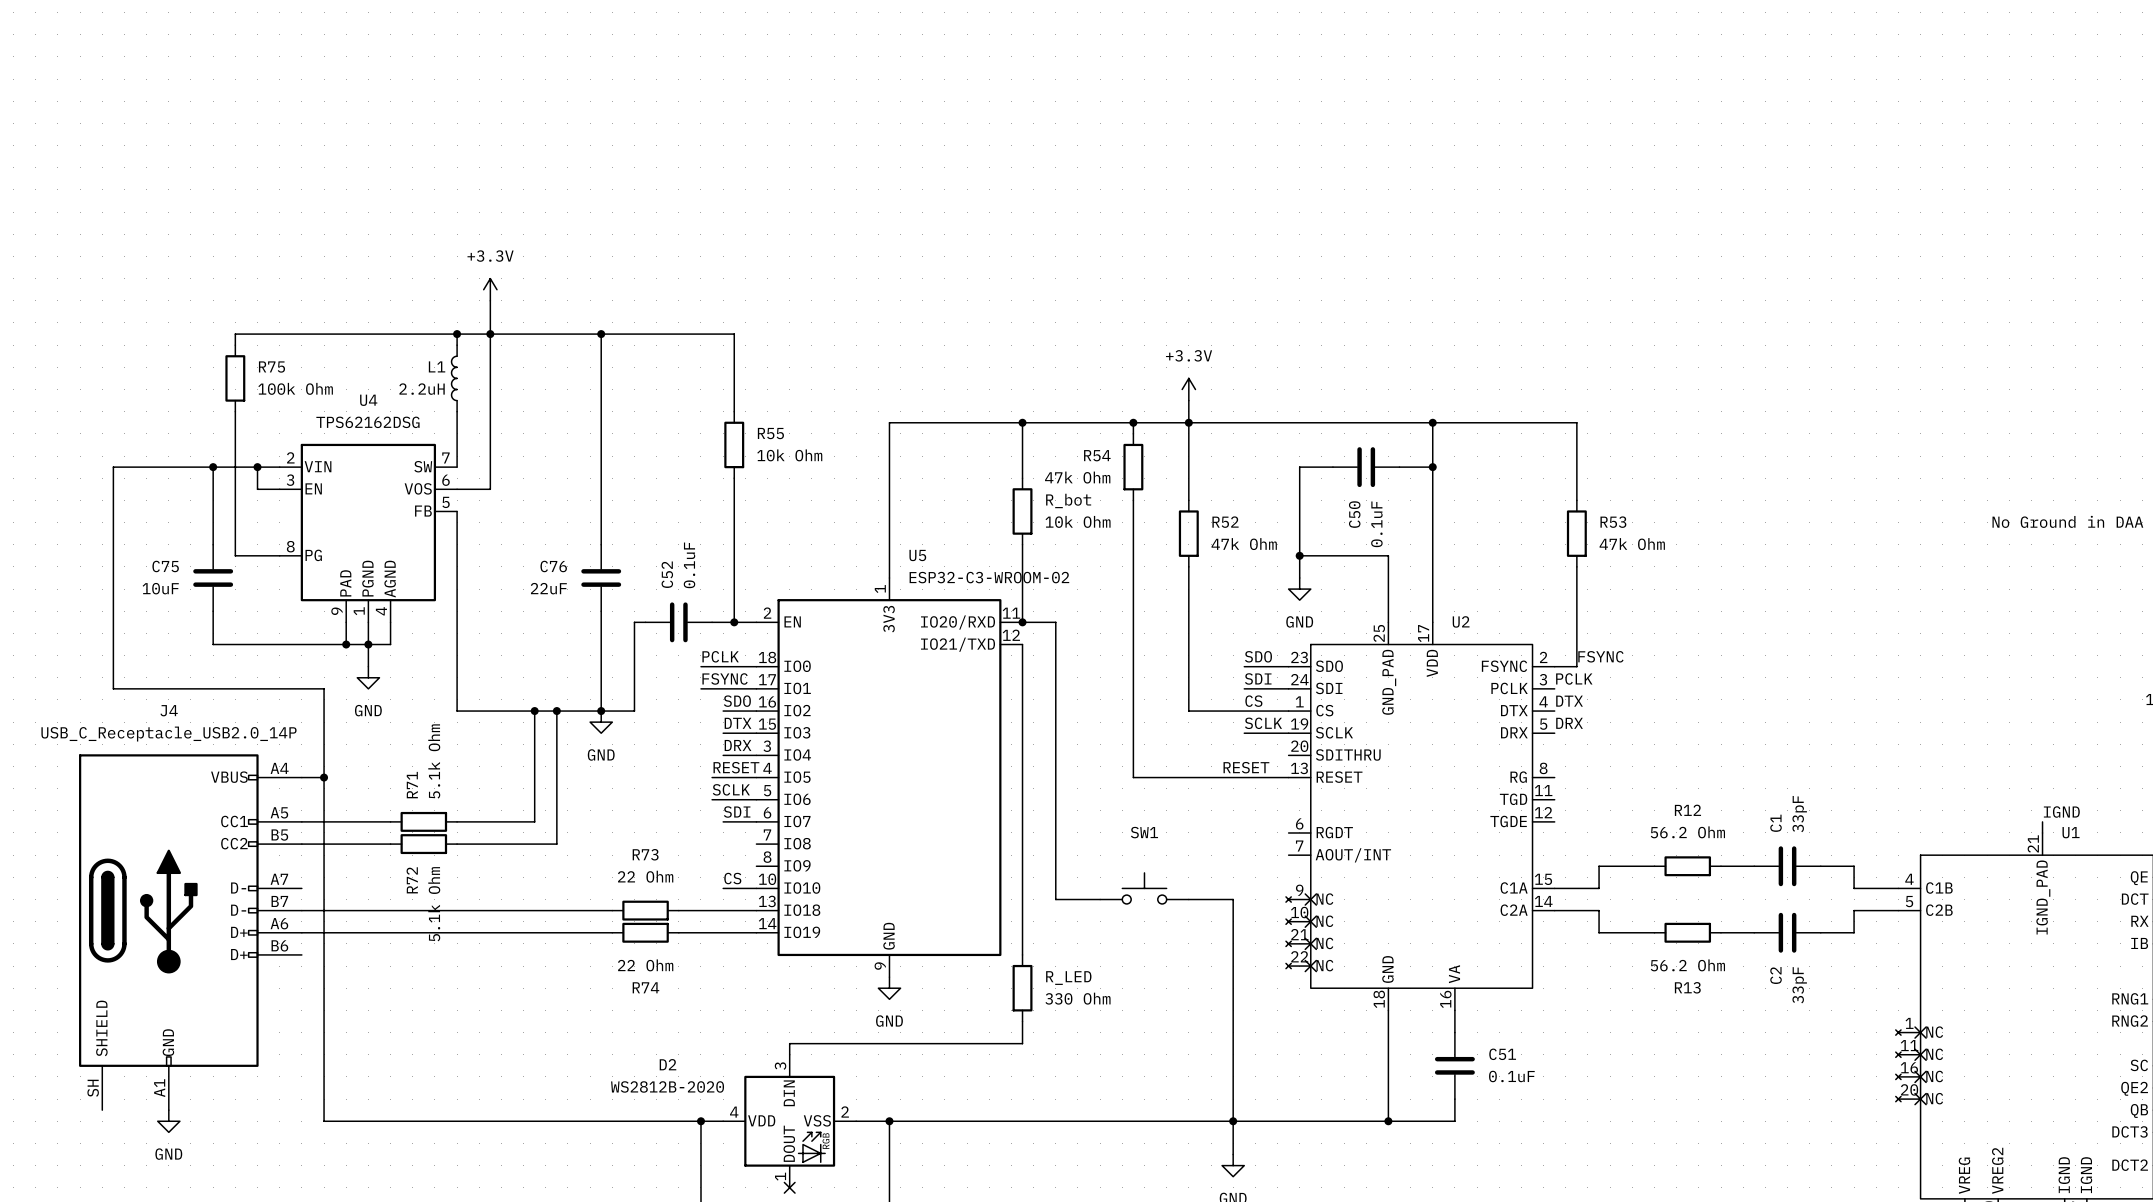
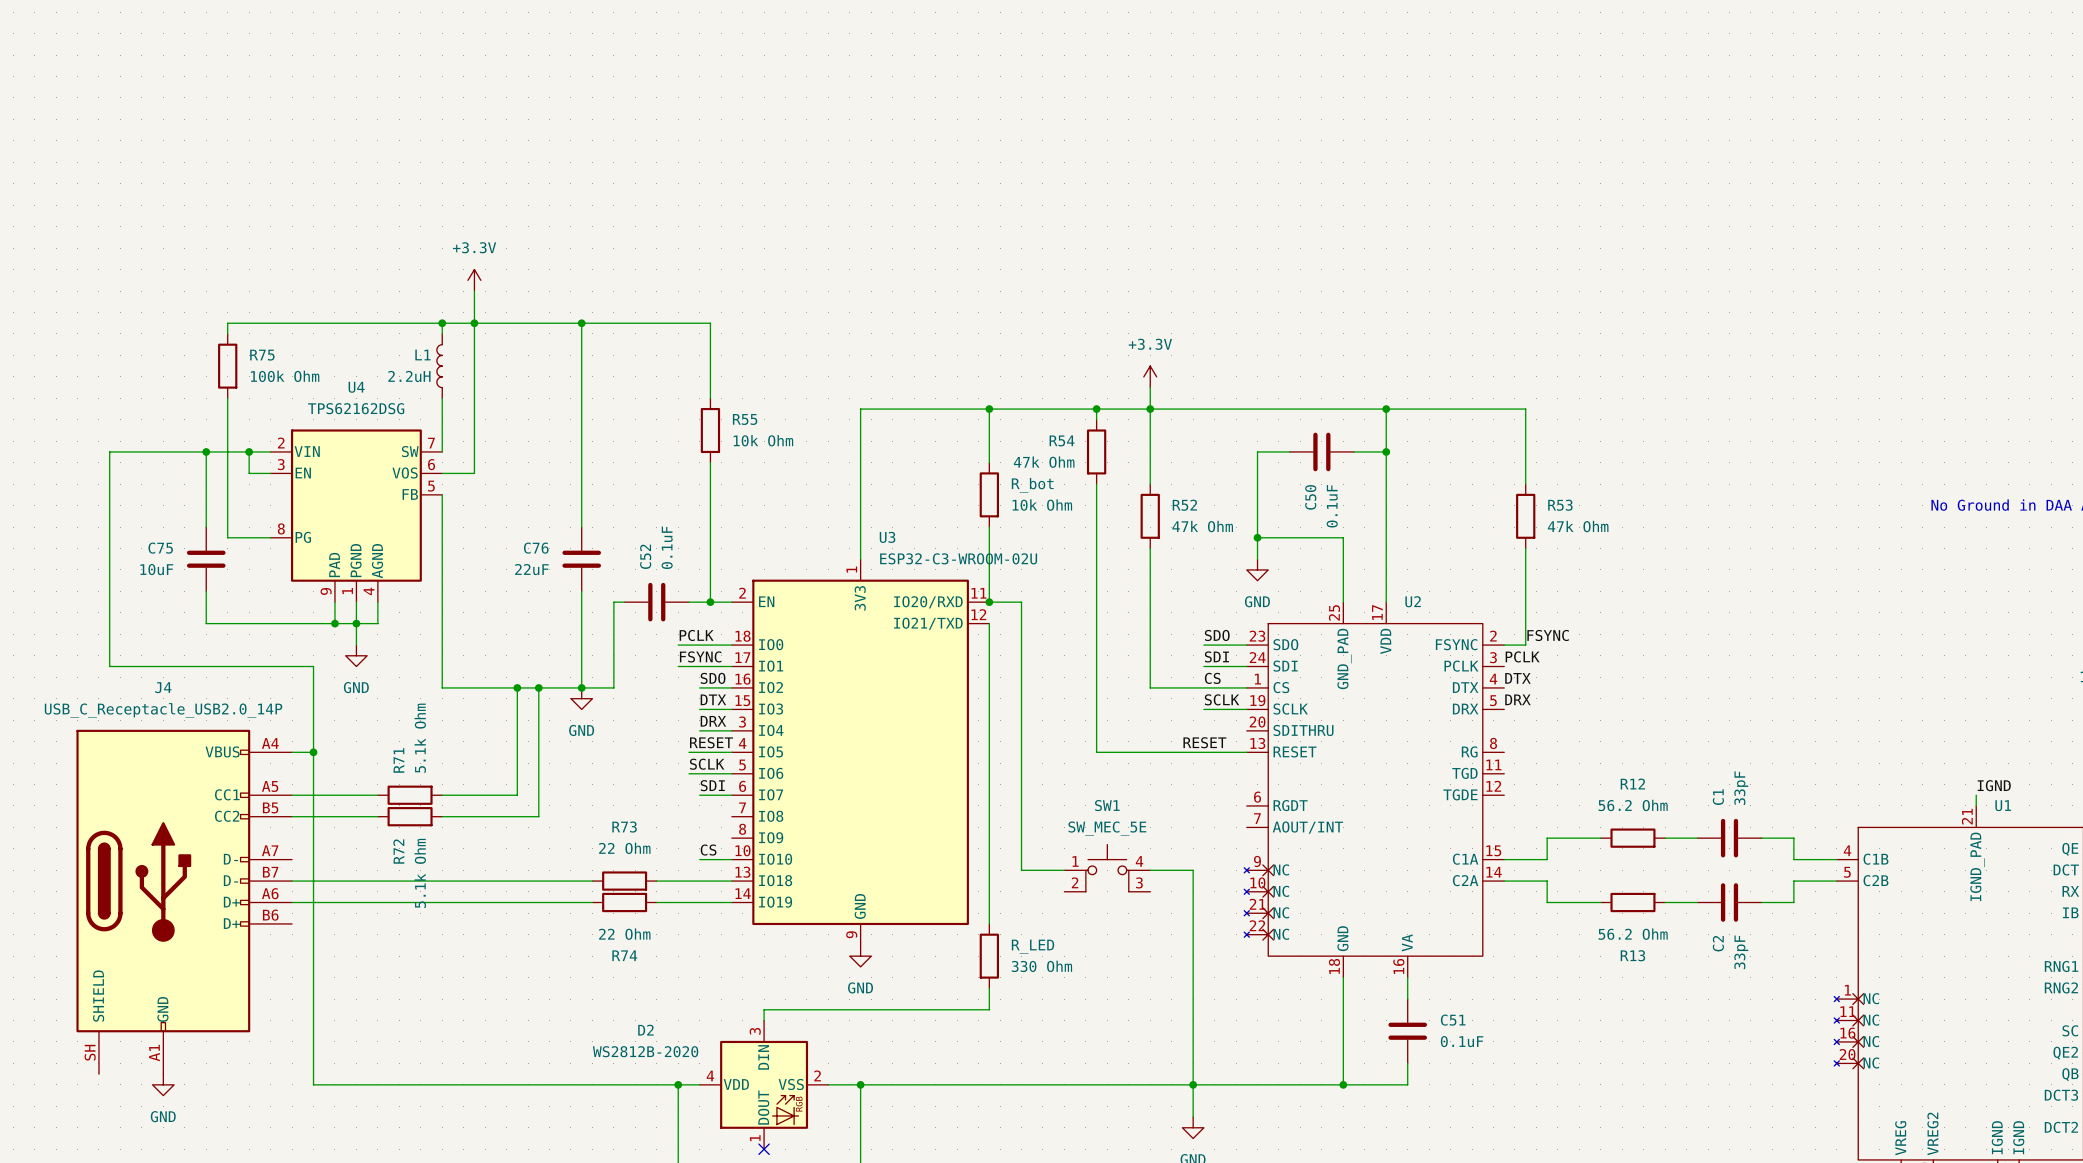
U5 name: U5 (917, 555) -> U3 (887, 537)
U5 value: ESP32-C3-WROOM-02 (989, 577) -> ESP32-C3-WROOM-02U (958, 558)
SW1 value: none -> SW_MEC_5E (1107, 828)
SW1 symbol: [1100, 872, 1189, 904] -> [1064, 844, 1151, 892]

